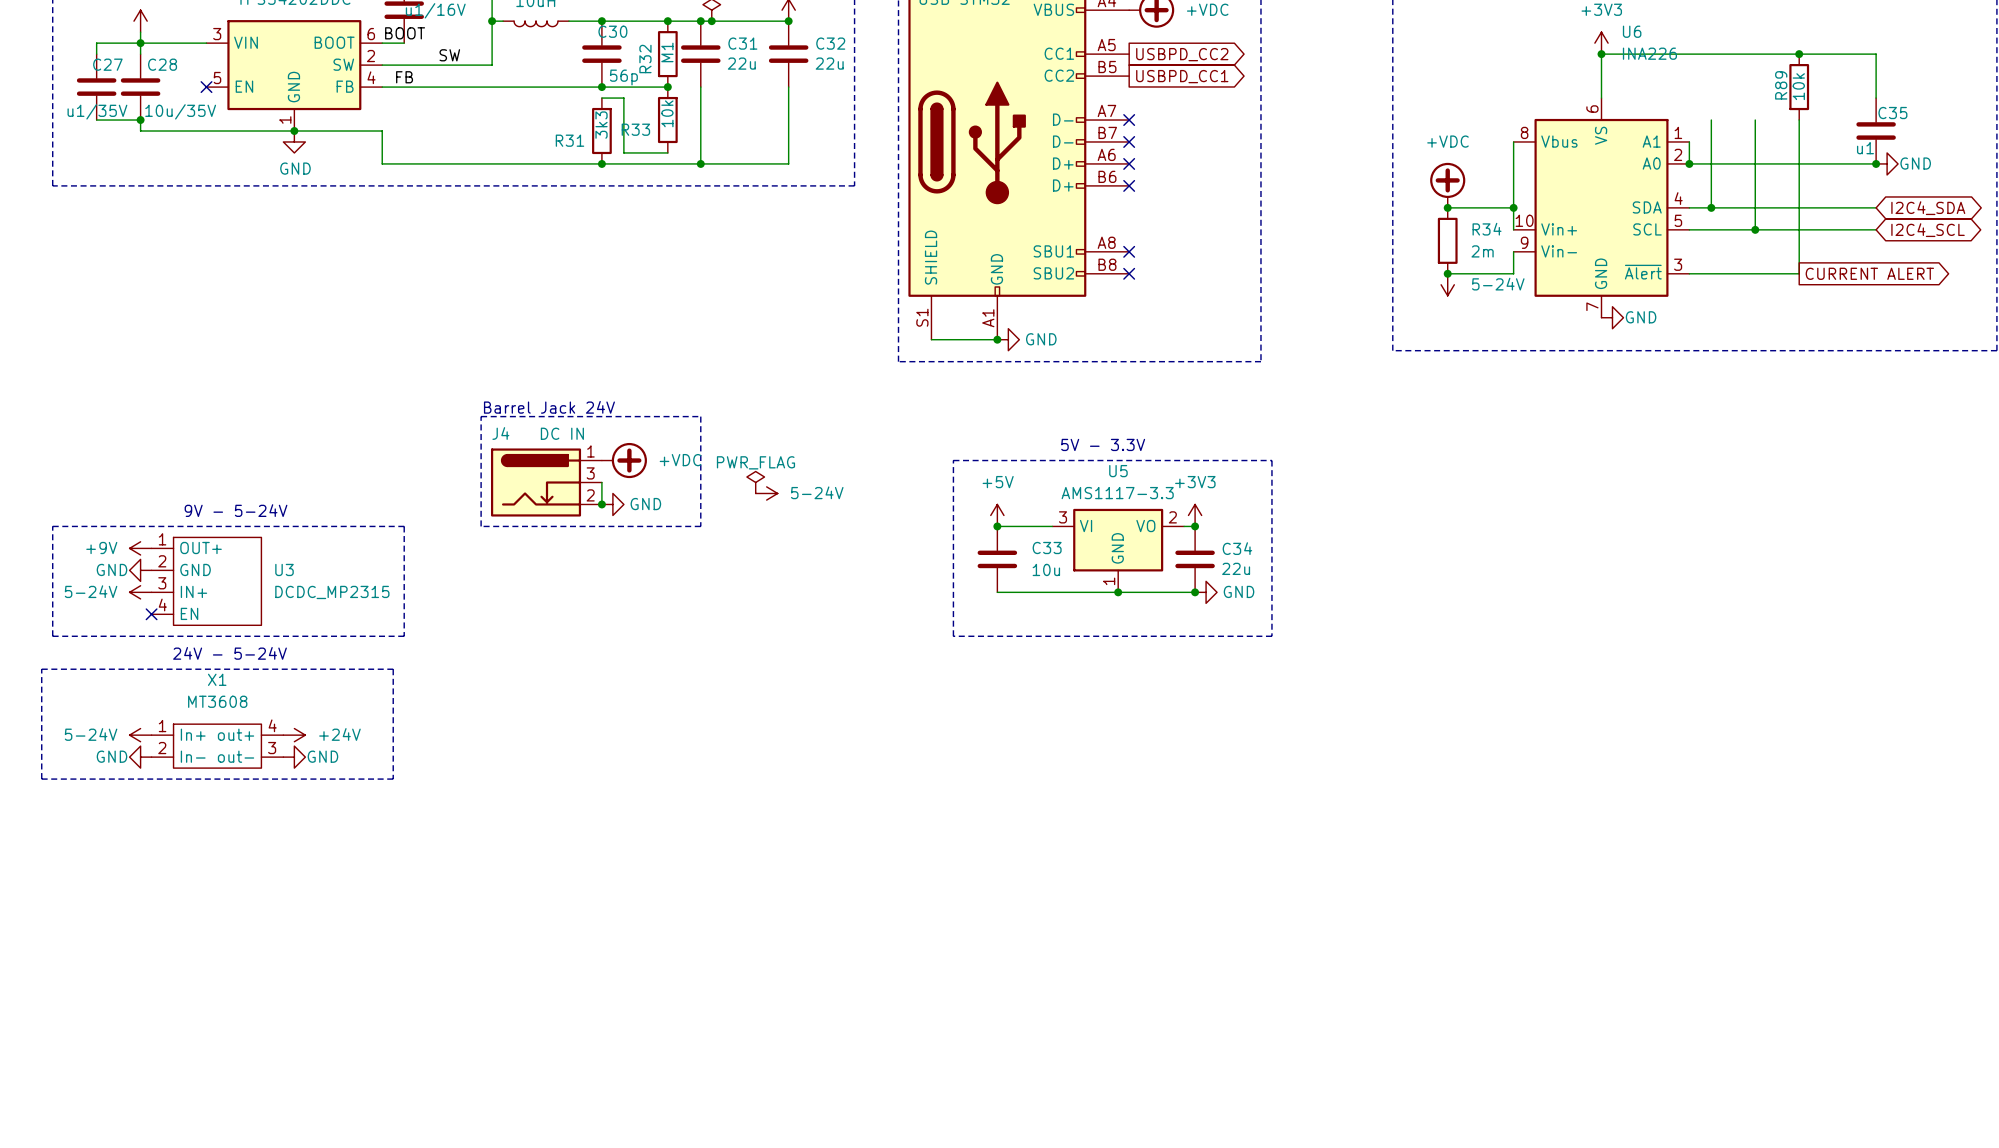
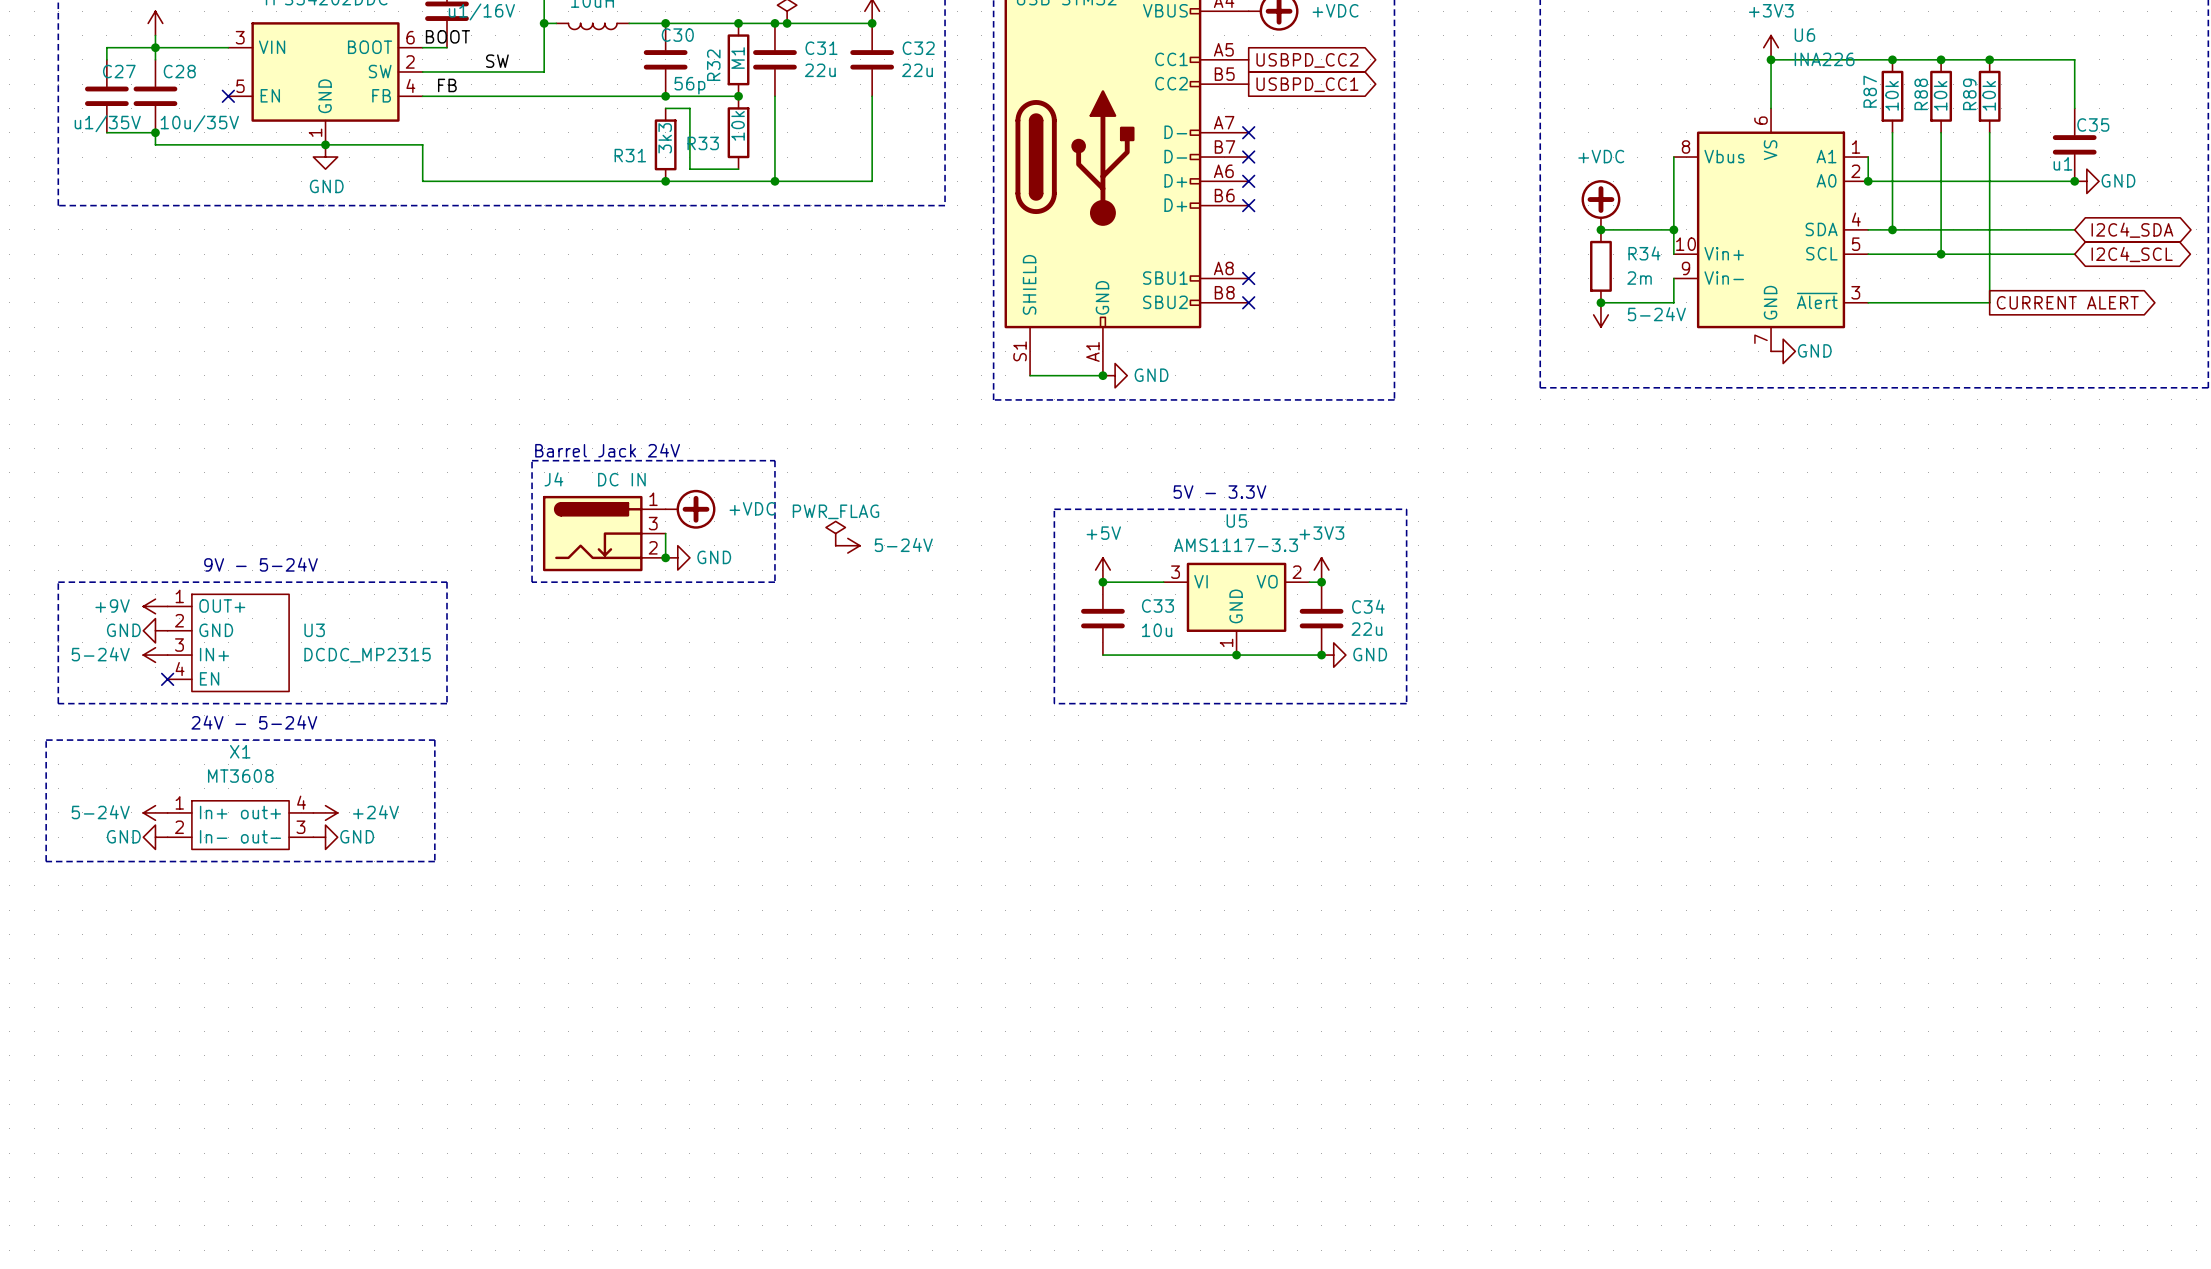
junction: none -> (1892, 59)
junction: none -> (1941, 59)
R87: none -> 10k (1892, 96)
R88: none -> 10k (1941, 96)

